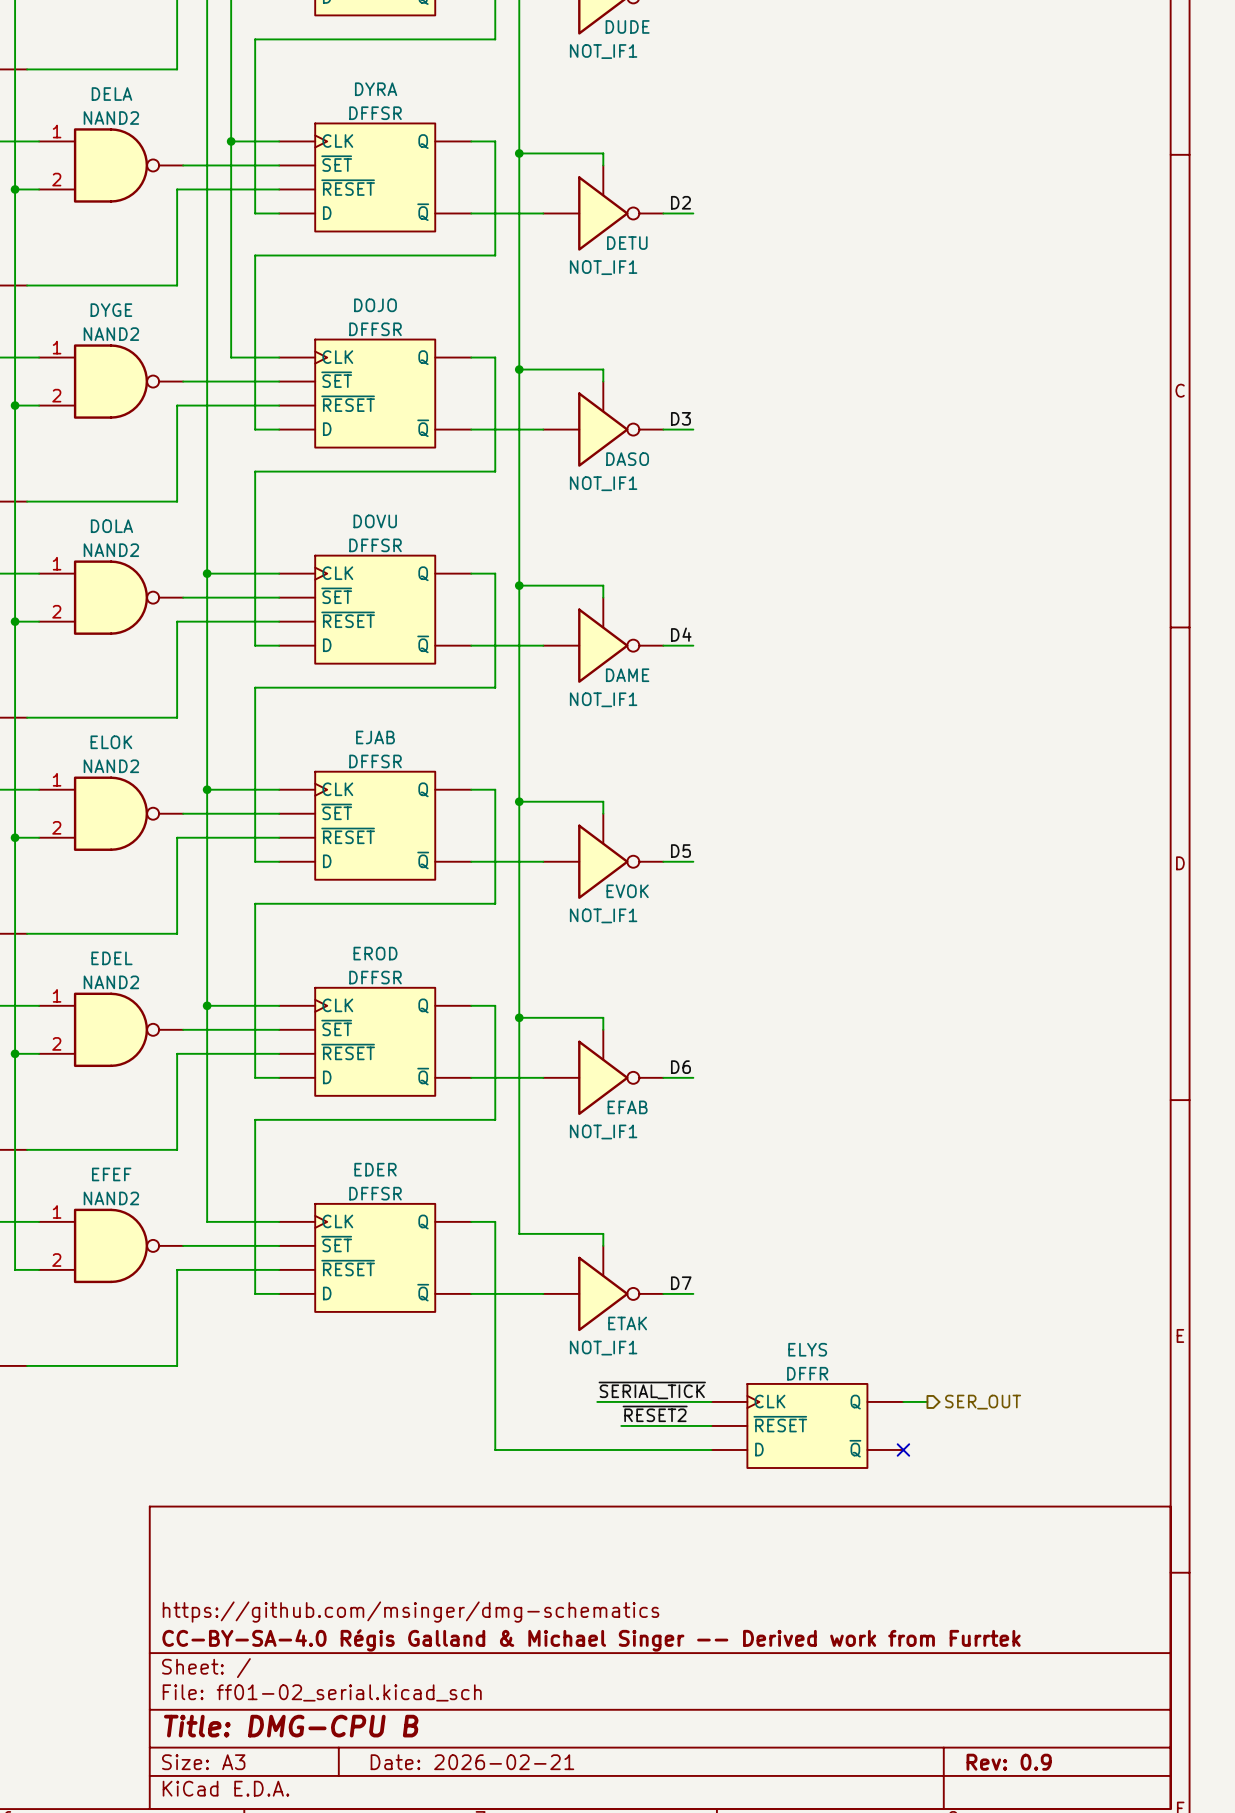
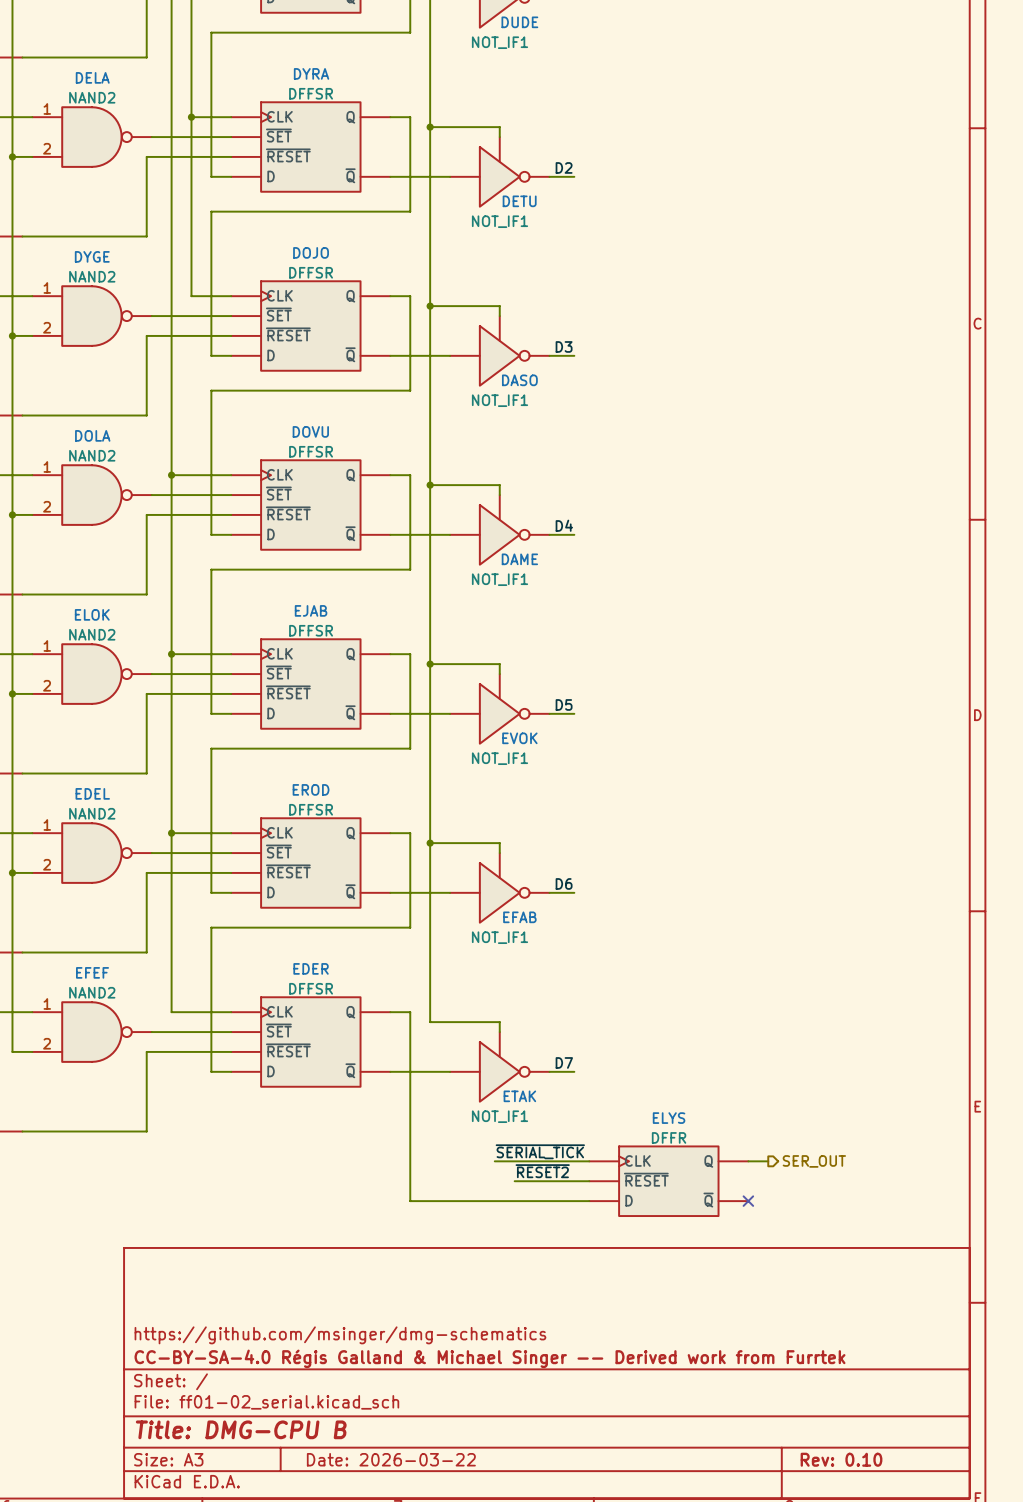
title block: Date: 2026-02-21 (472, 1762) -> Date: 2026-03-22 (391, 1459)
title block: Rev: 0.9 (1009, 1762) -> Rev: 0.10 (841, 1459)

